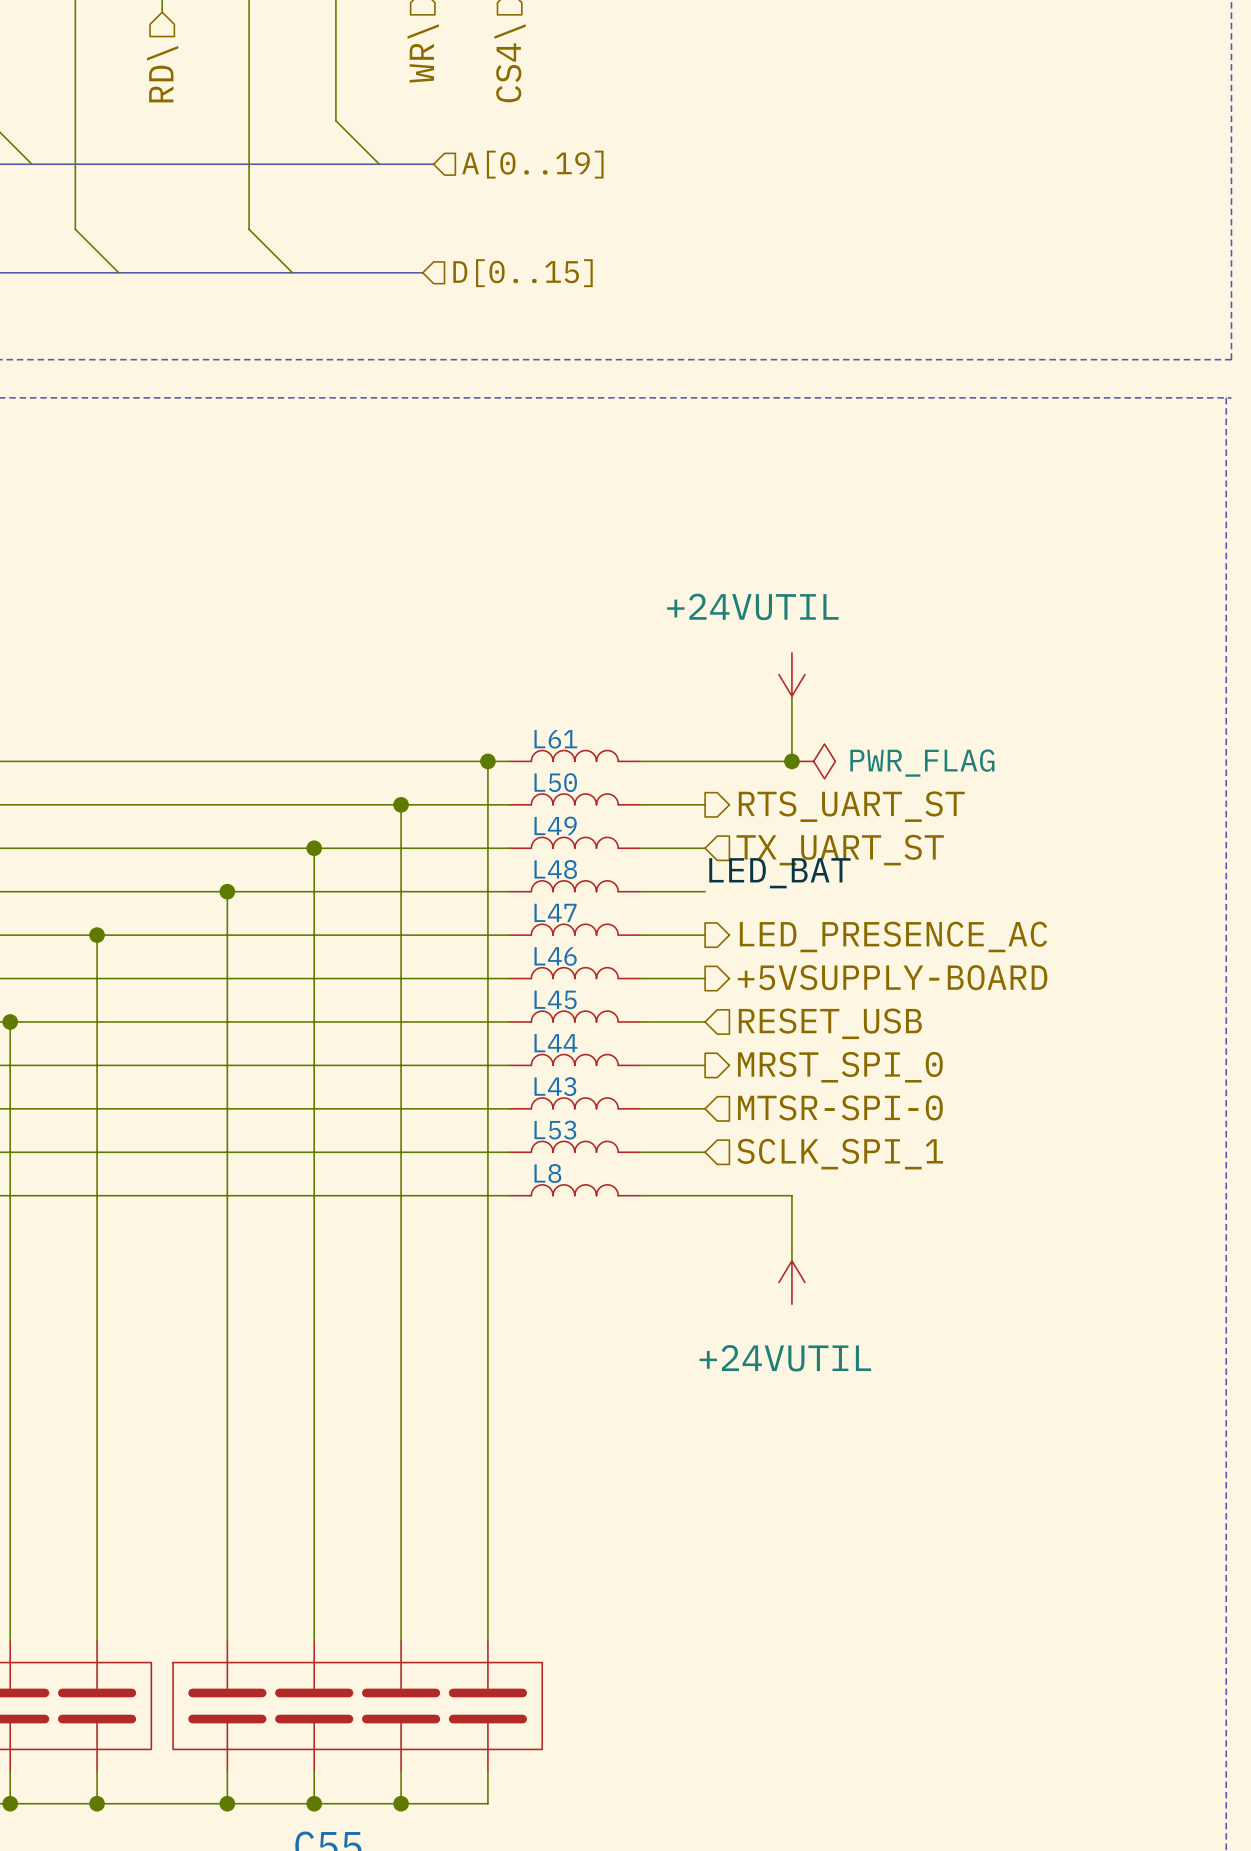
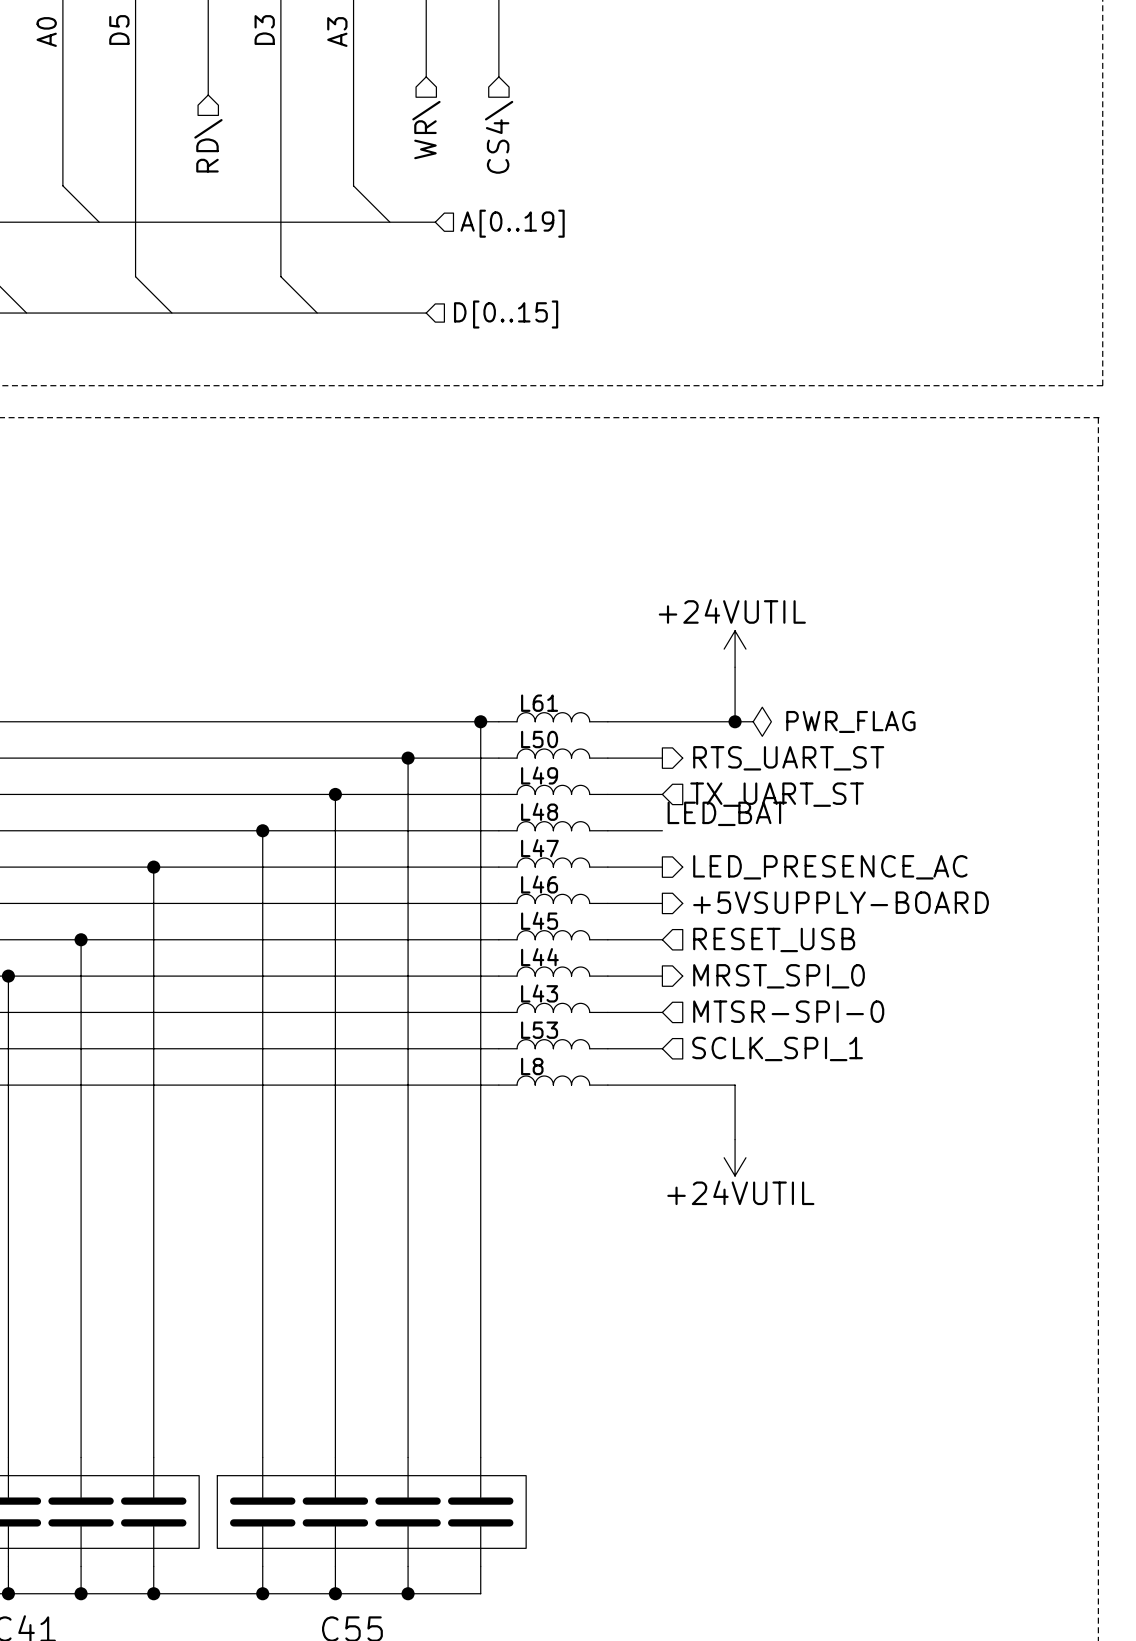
power symbol text position: +24VUTIL (752, 606) -> +24VUTIL (732, 611)
power symbol rotation: 0° (791, 674) -> 180° (735, 649)
power symbol rotation: 0° (791, 1282) -> 180° (735, 1157)
power symbol text position: +24VUTIL (785, 1358) -> +24VUTIL (740, 1192)

